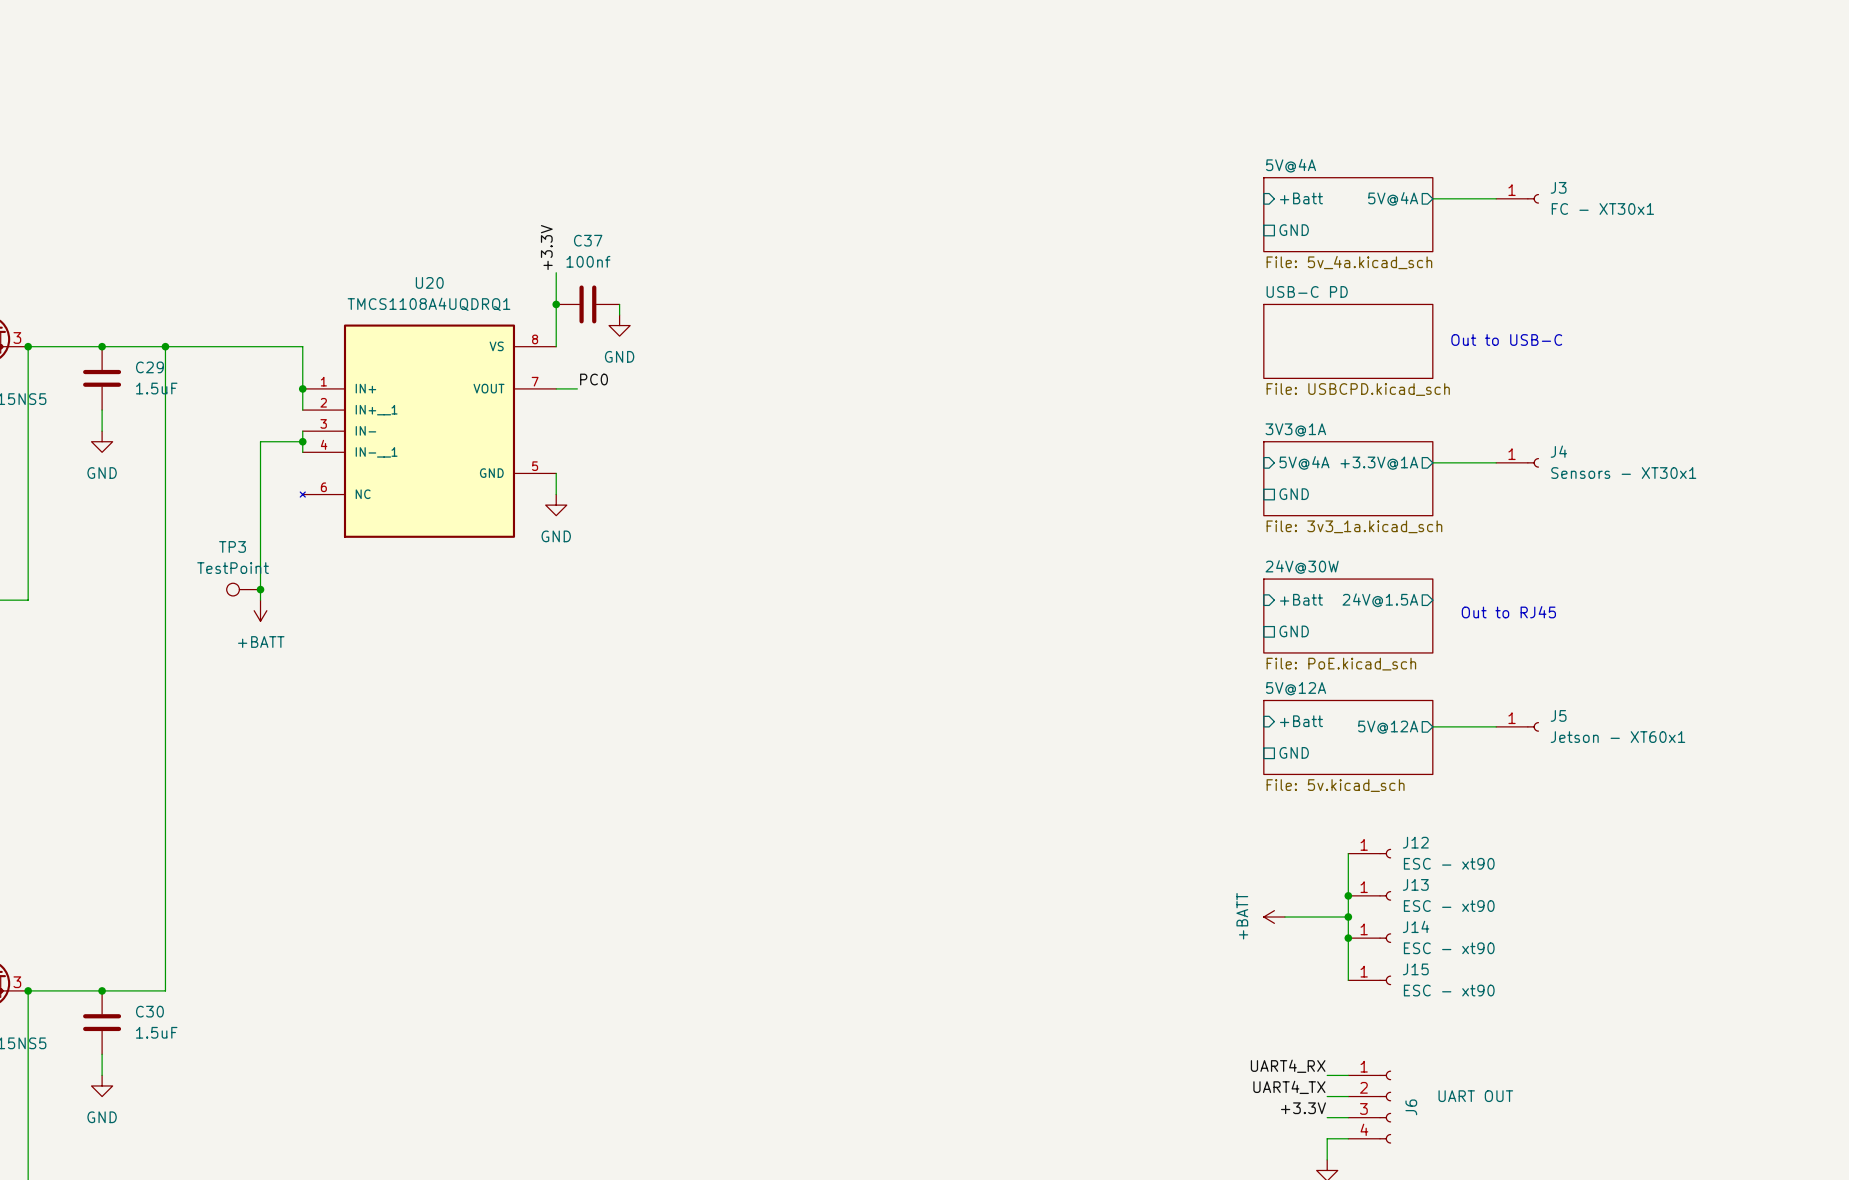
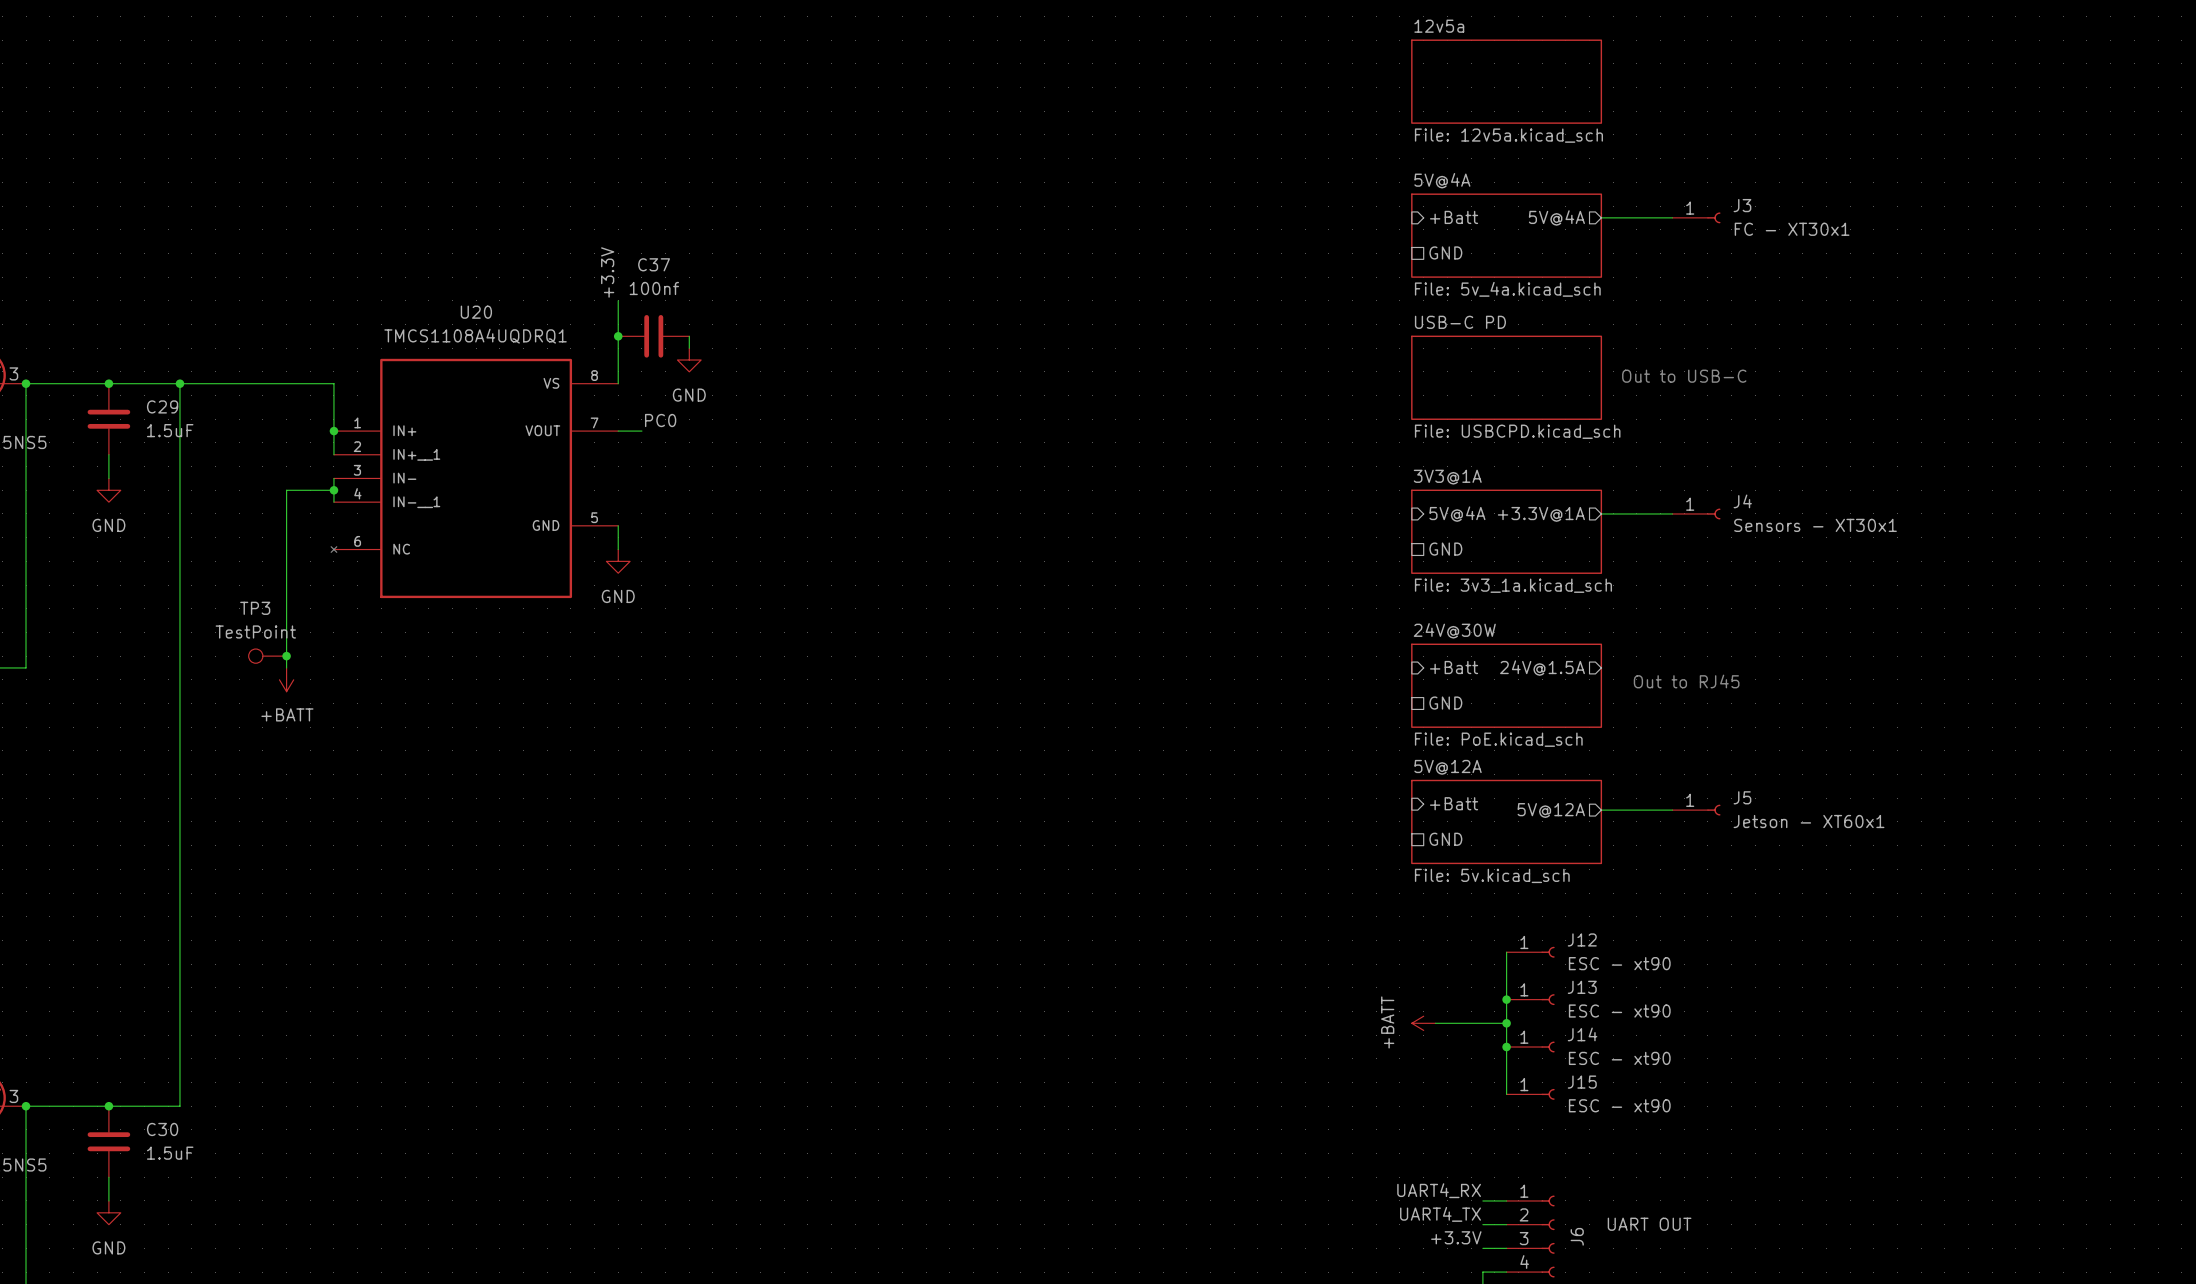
sheet 12v5a: none -> File: 12v5a.kicad_sch (1506, 81)

